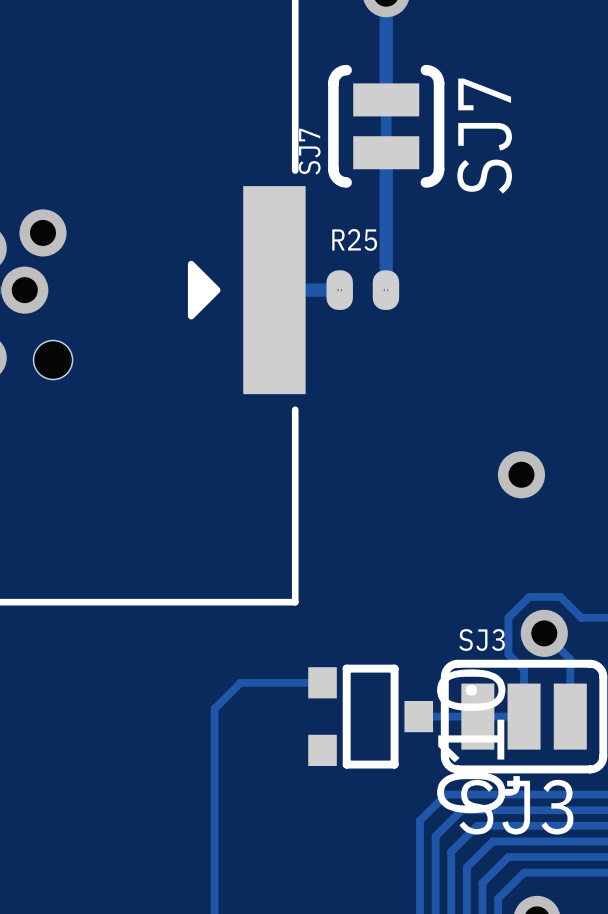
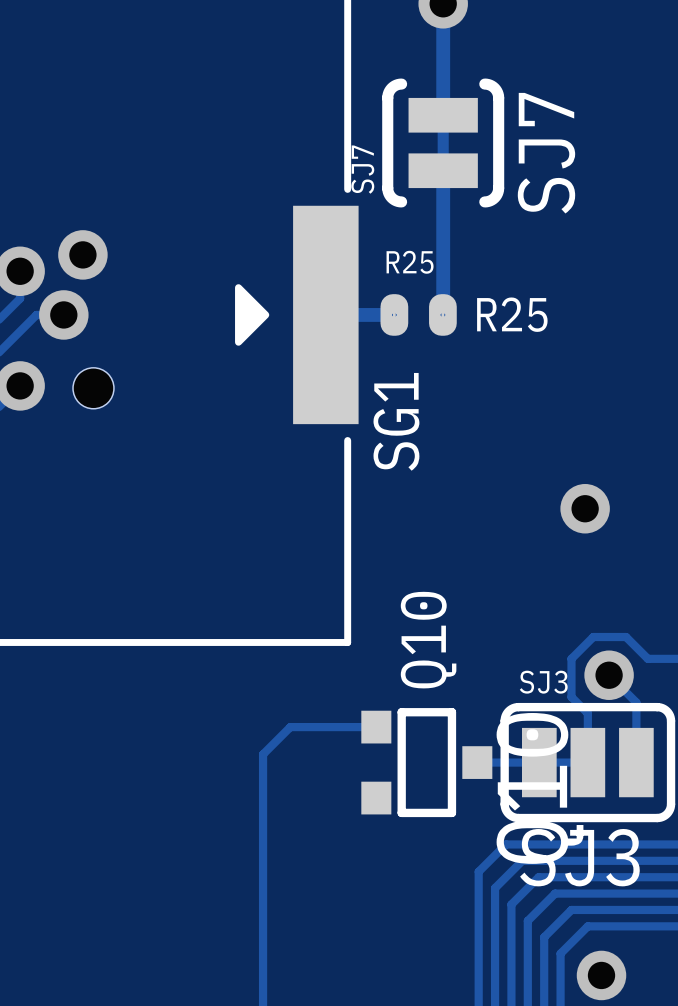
text: none -> R25 (512, 314)
text: none -> SG1 (396, 421)
text: none -> Q10 (428, 640)

